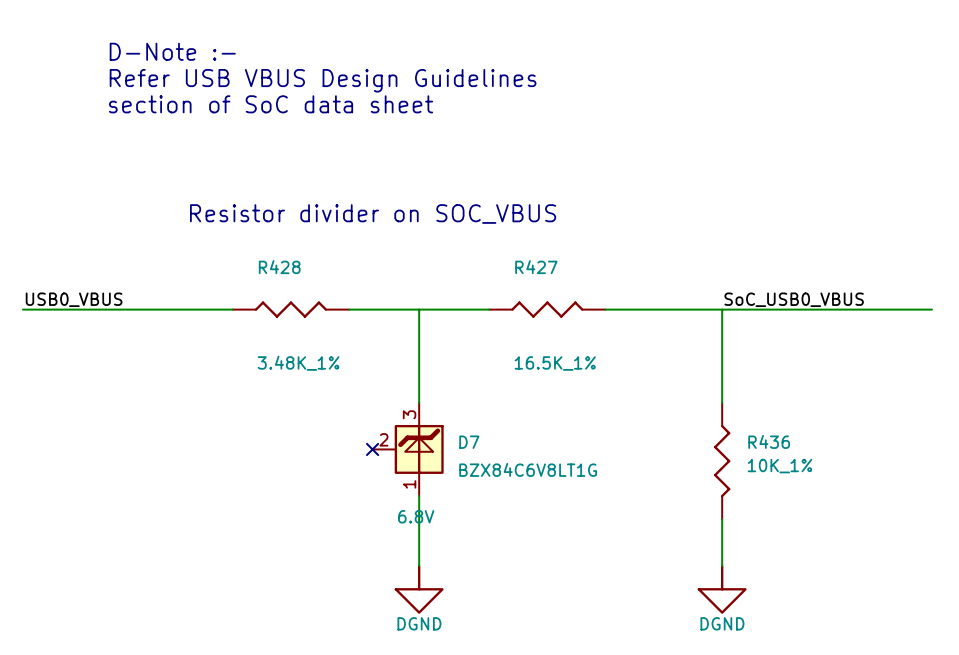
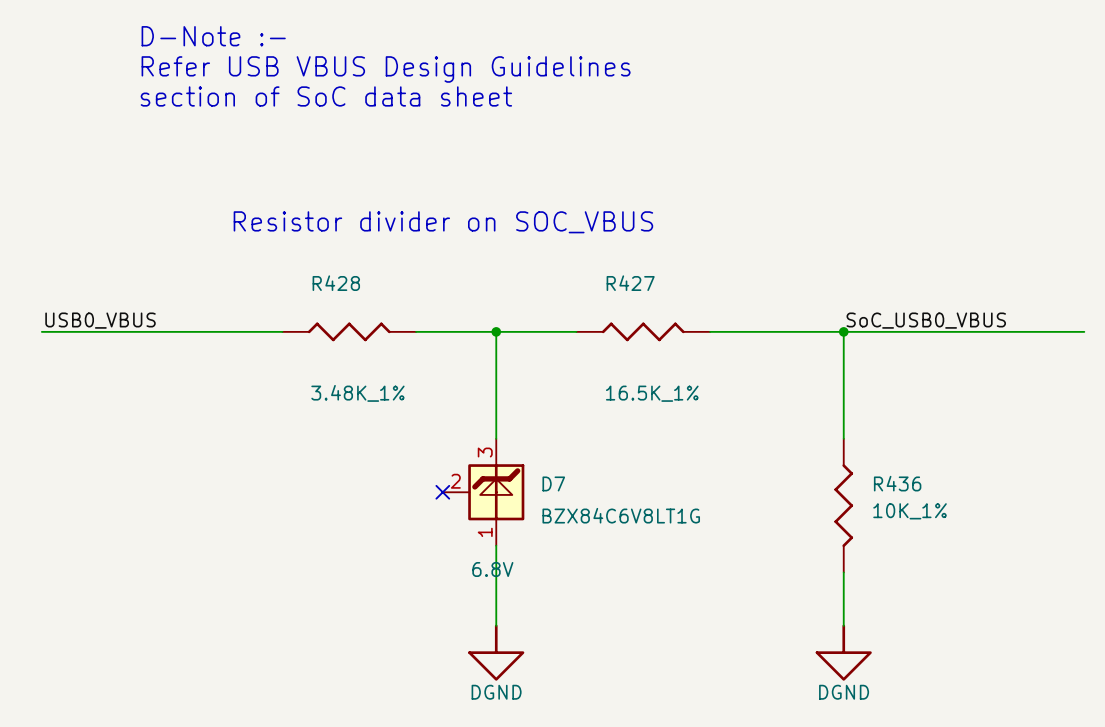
junction: none -> (496, 331)
junction: none -> (843, 331)

